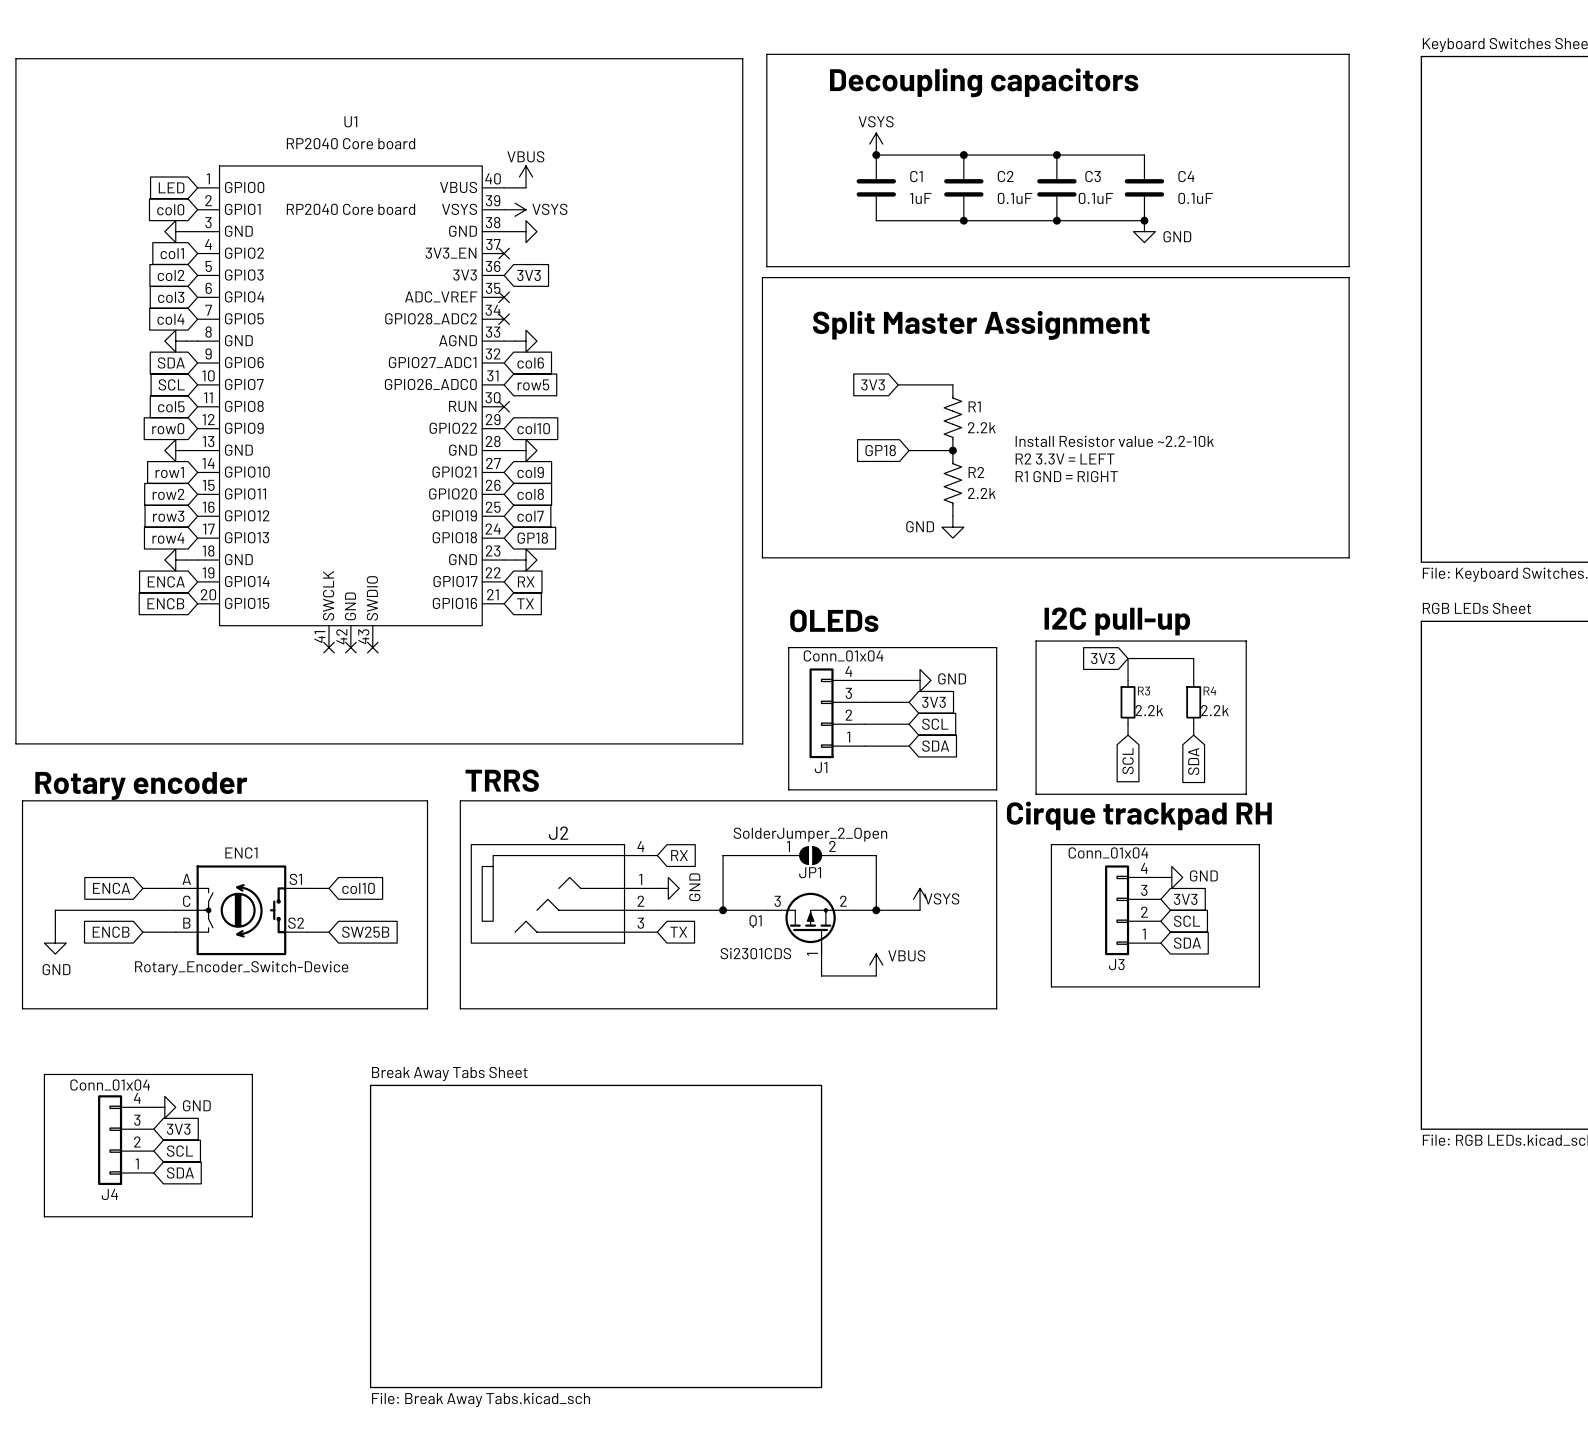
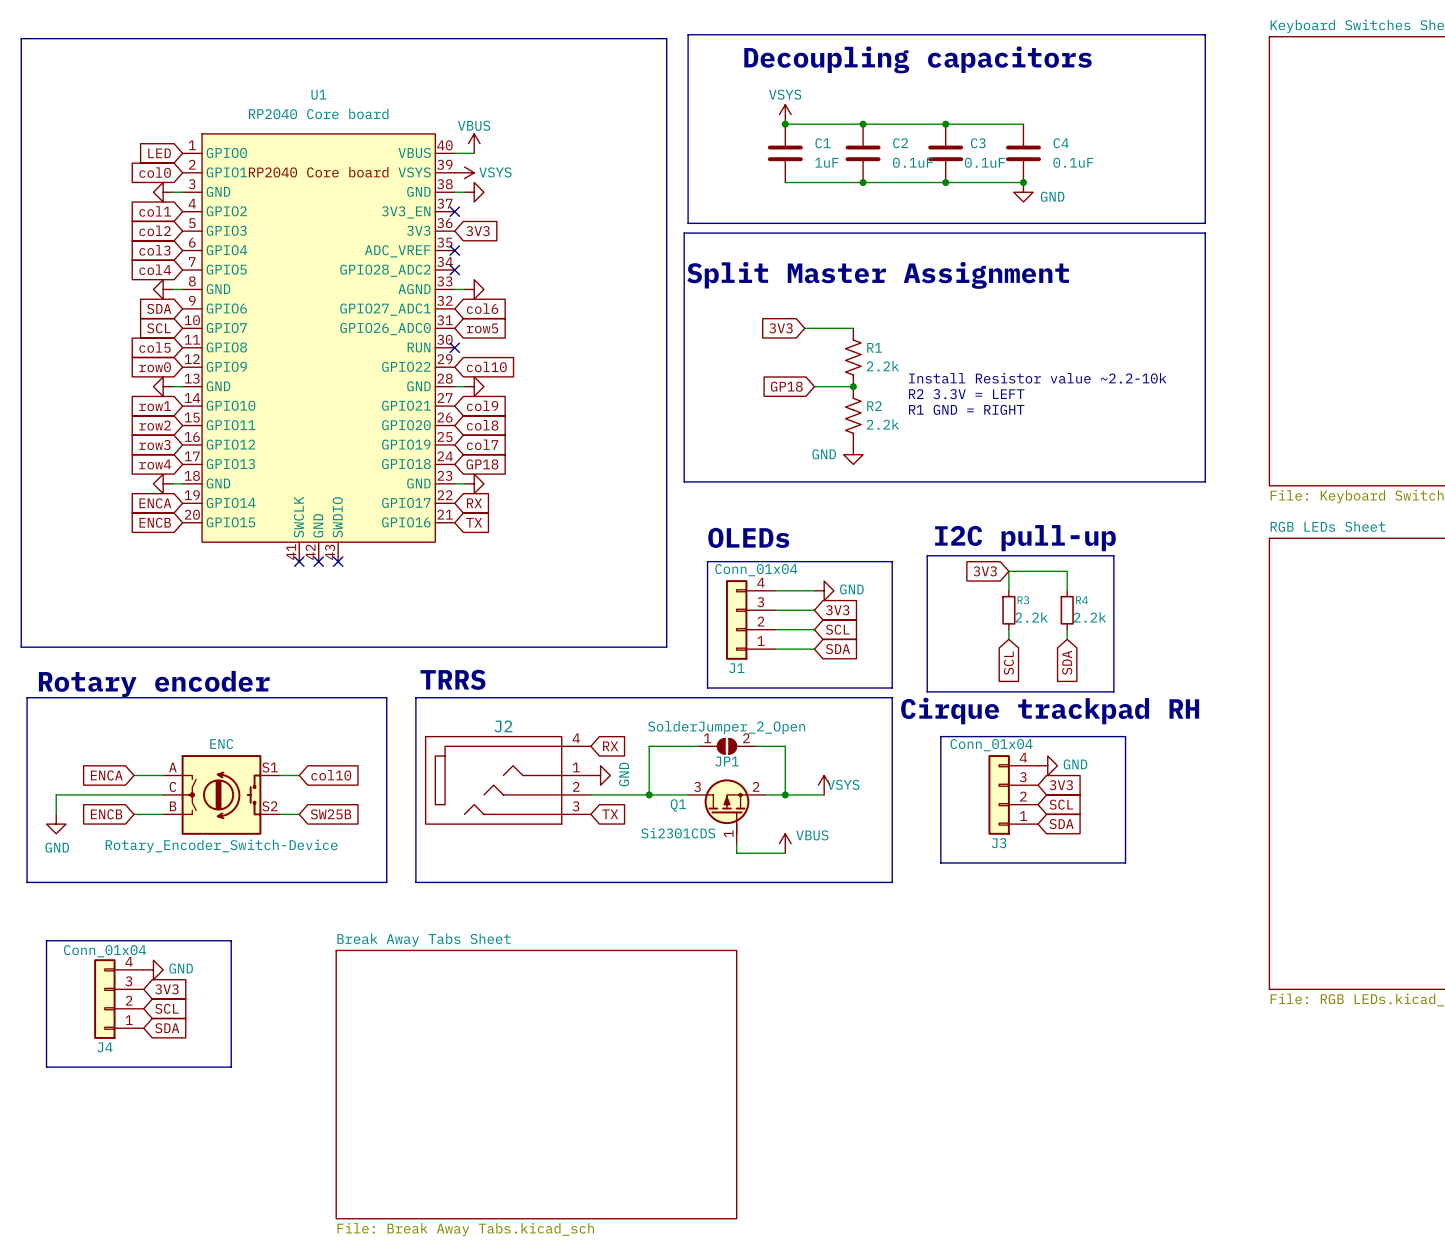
ENC1 name: ENC1 (241, 852) -> ENC (221, 744)

